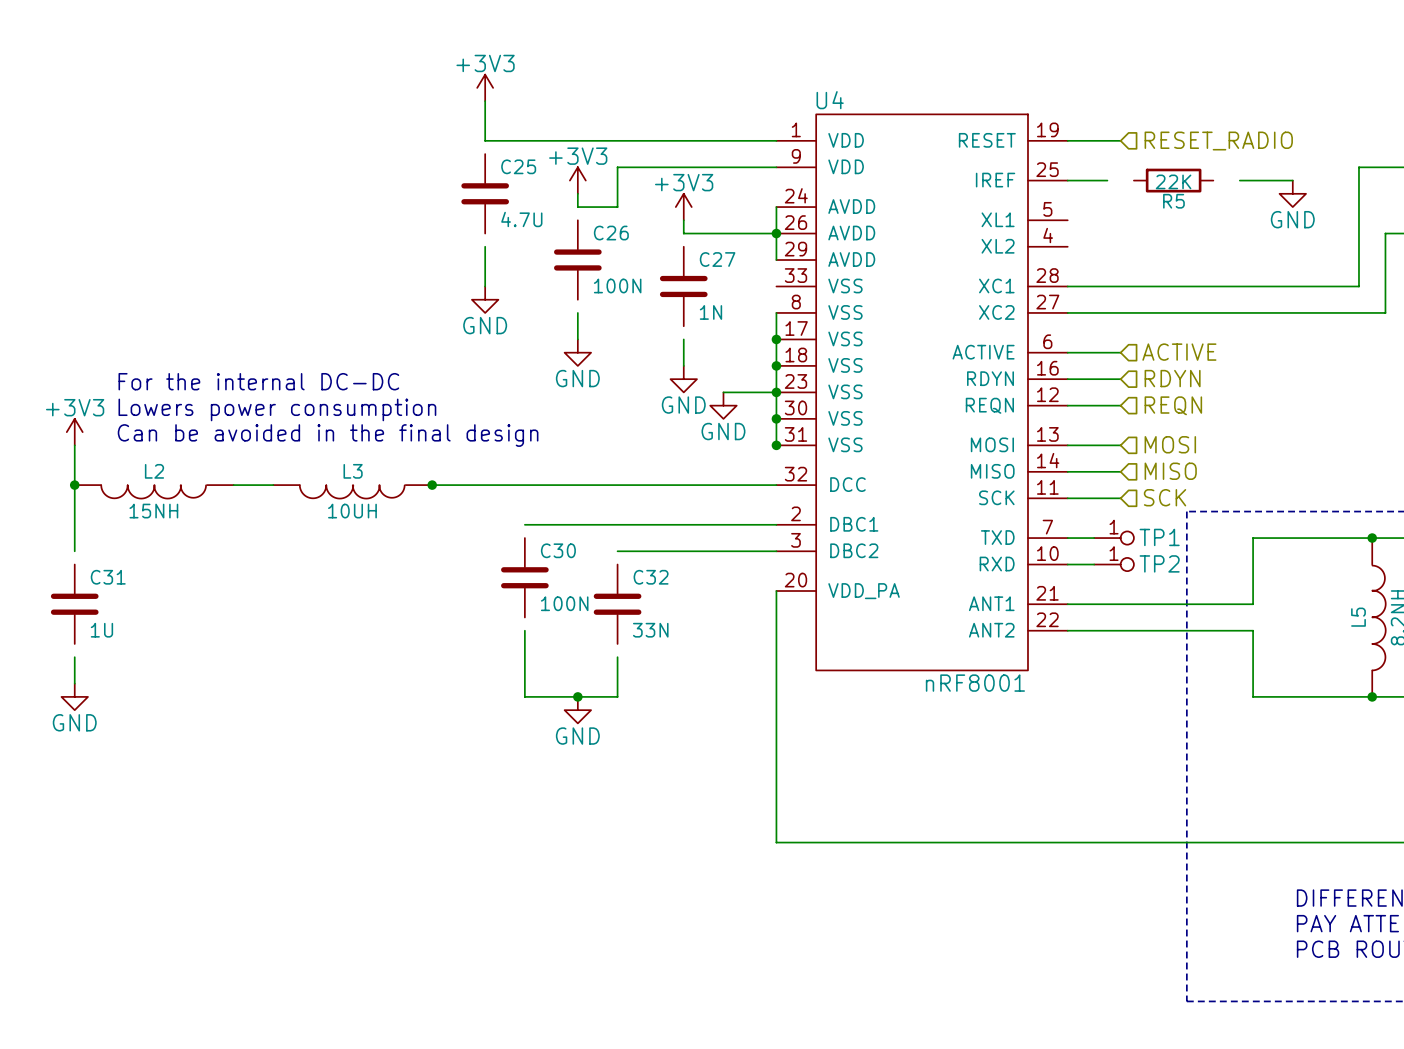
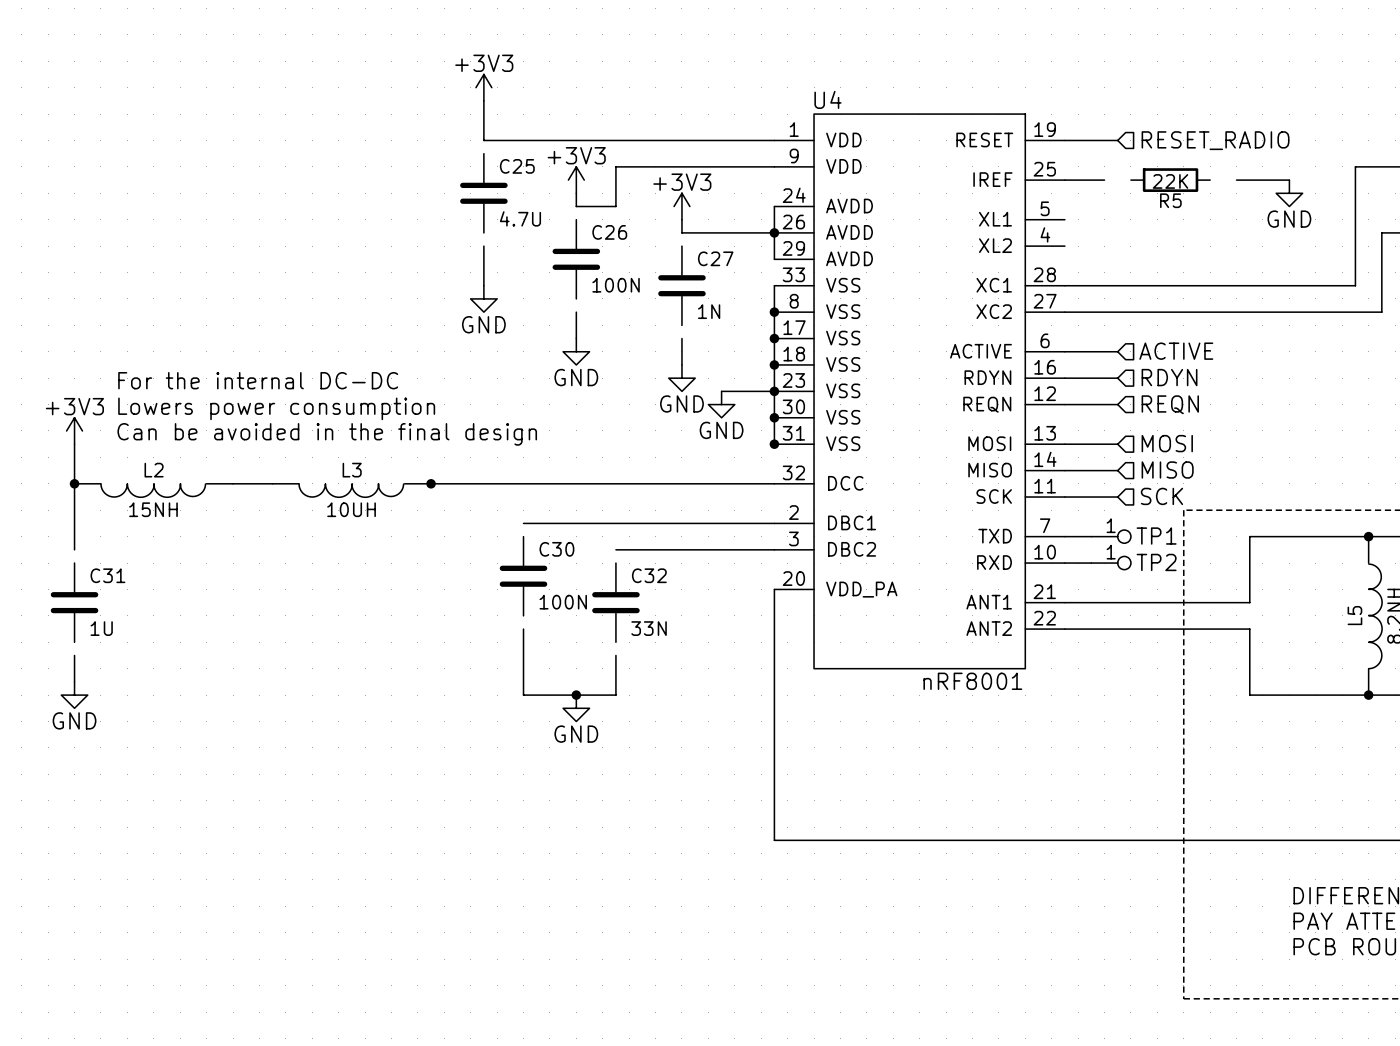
wire: none -> (774, 285) (774, 312)
junction: none -> (774, 312)

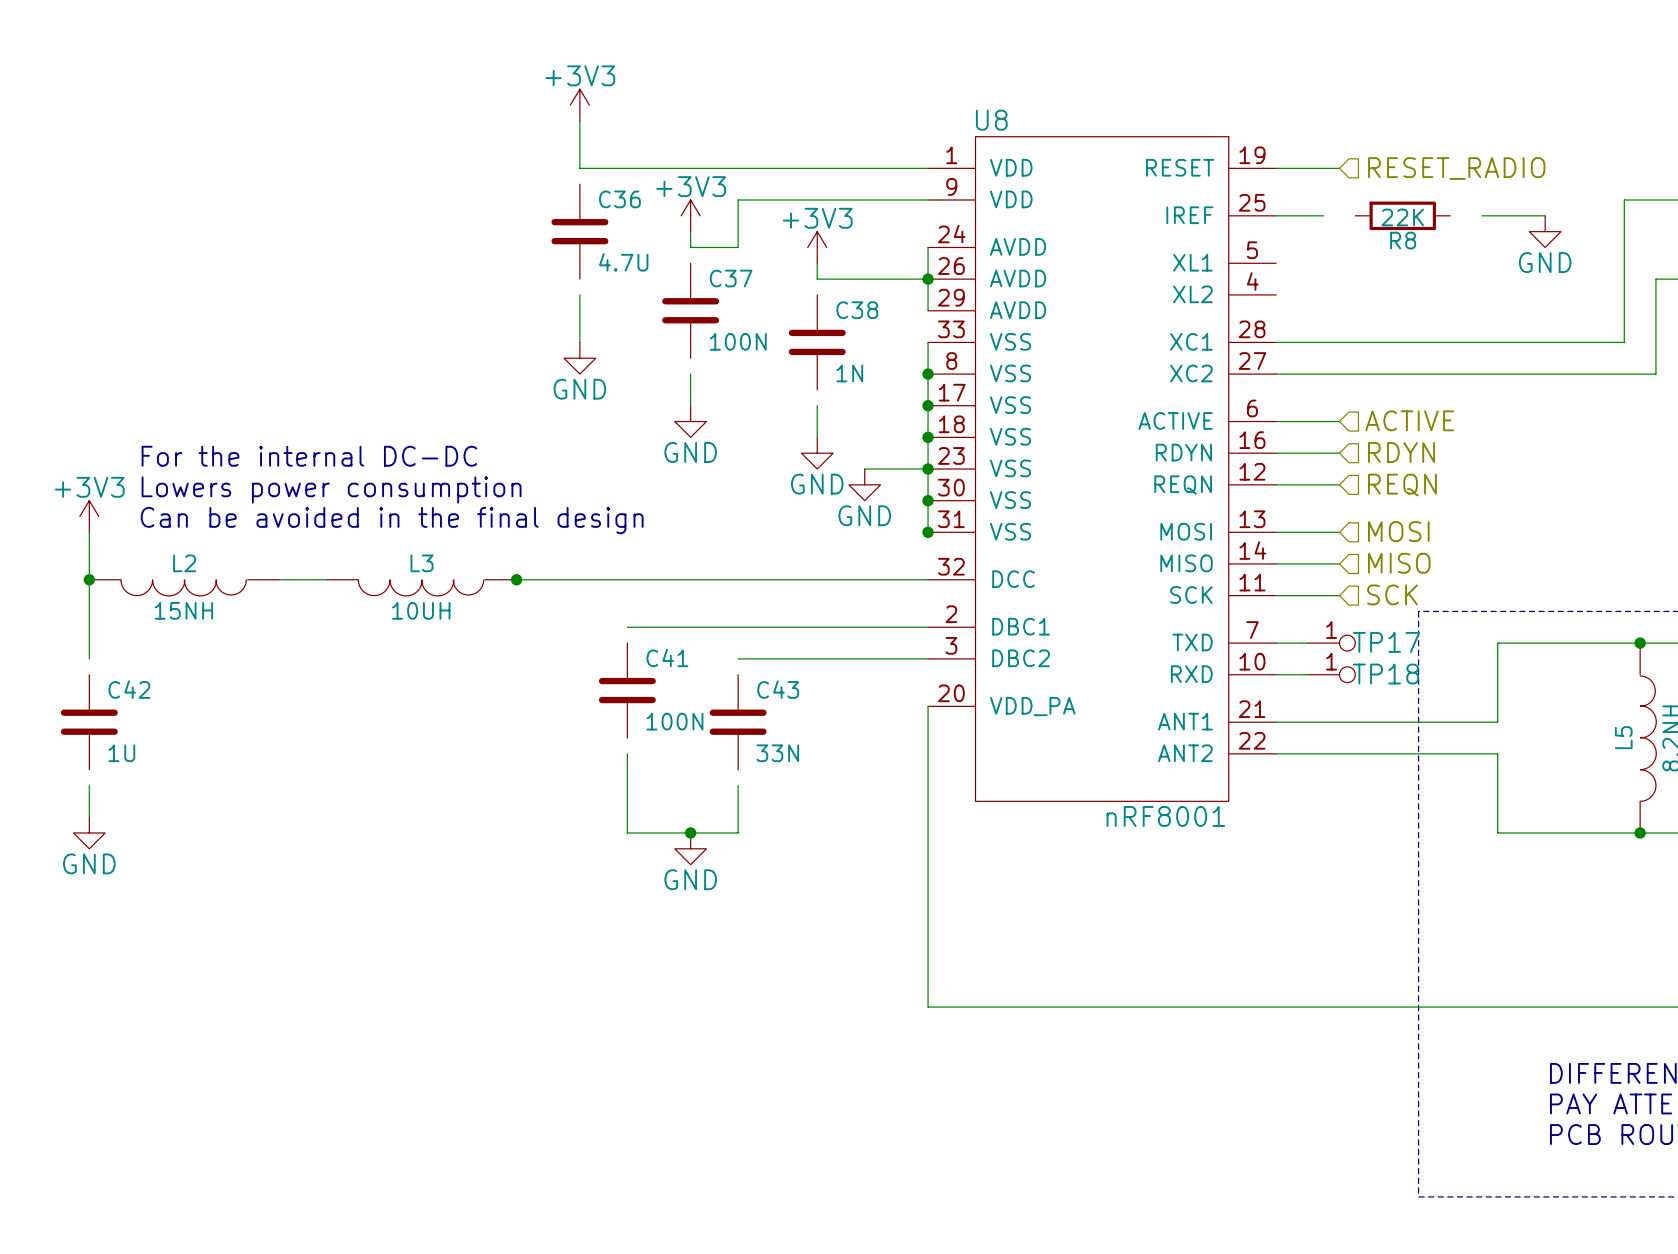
U4 name: U4 (827, 99) -> U8 (991, 120)
C25 name: C25 (517, 166) -> C36 (619, 199)
R5 name: R5 (1170, 200) -> R8 (1403, 240)
C26 name: C26 (609, 232) -> C37 (731, 278)
C27 name: C27 (715, 258) -> C38 (857, 310)
TP1 name: TP1 (1156, 536) -> TP17 (1386, 642)
C30 name: C30 (556, 549) -> C41 (667, 657)
TP2 name: TP2 (1156, 562) -> TP18 (1386, 674)
C31 name: C31 (107, 575) -> C42 (129, 689)
C32 name: C32 (649, 575) -> C43 (778, 689)

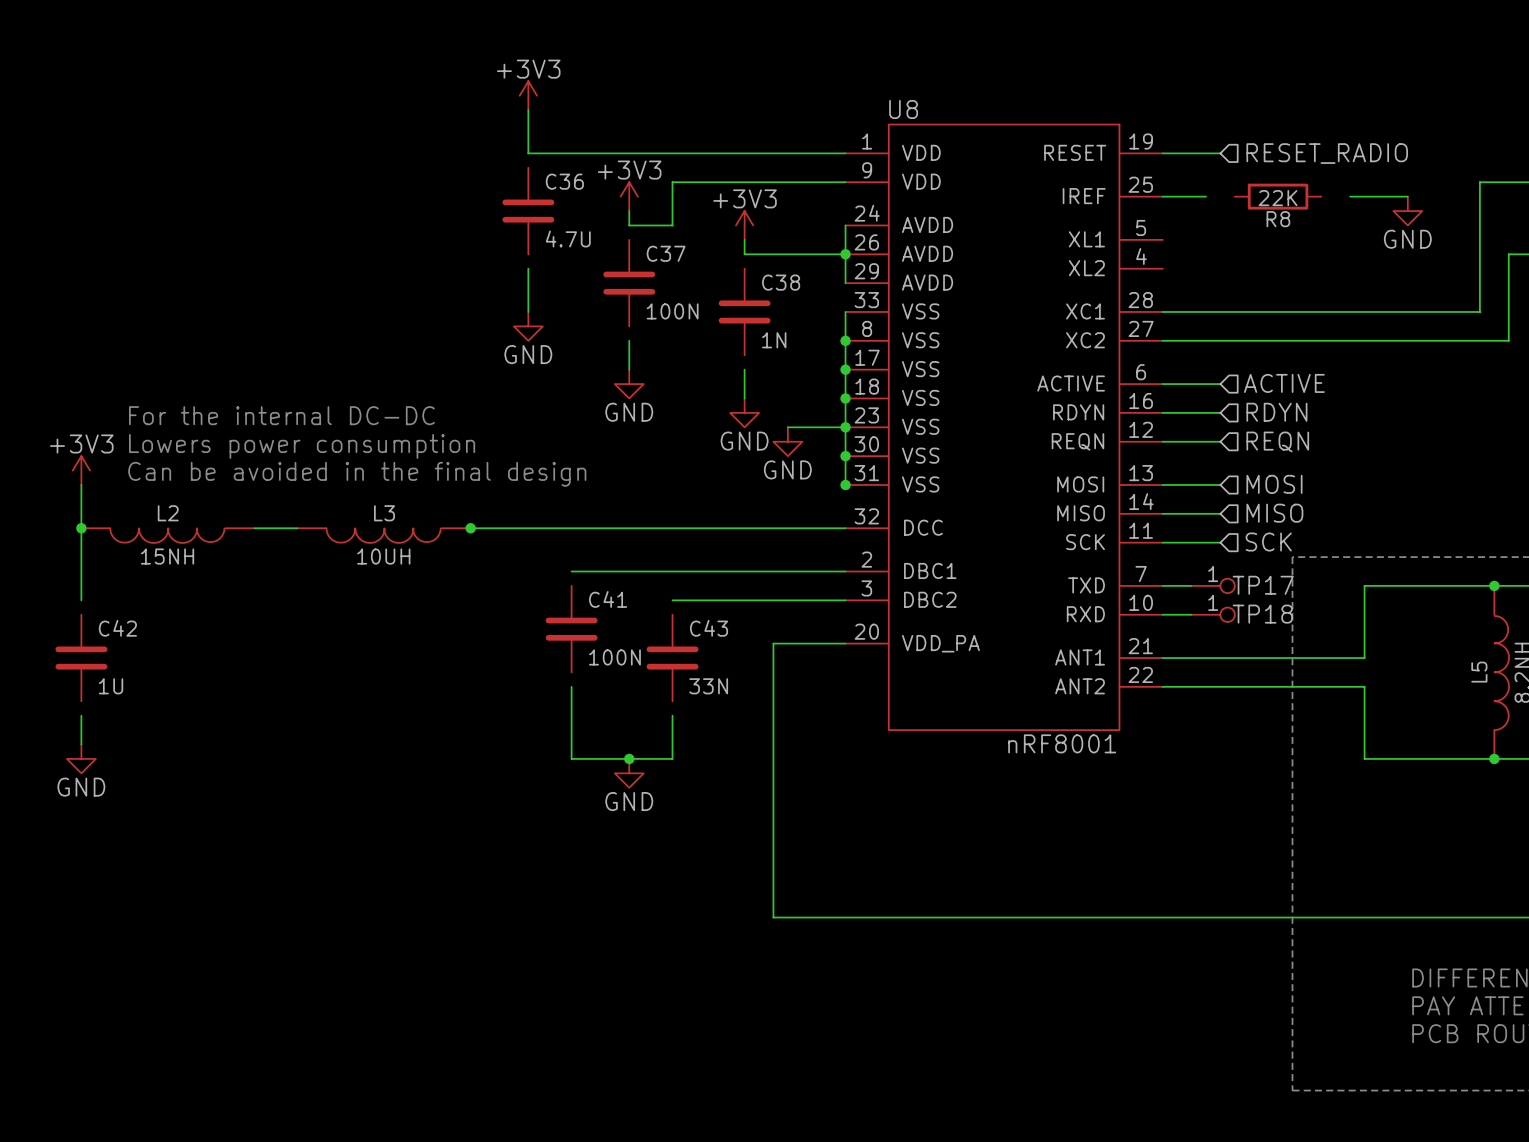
wire: (928, 706) (928, 1007) -> (845, 643) (773, 643) (773, 917) (845, 917)

